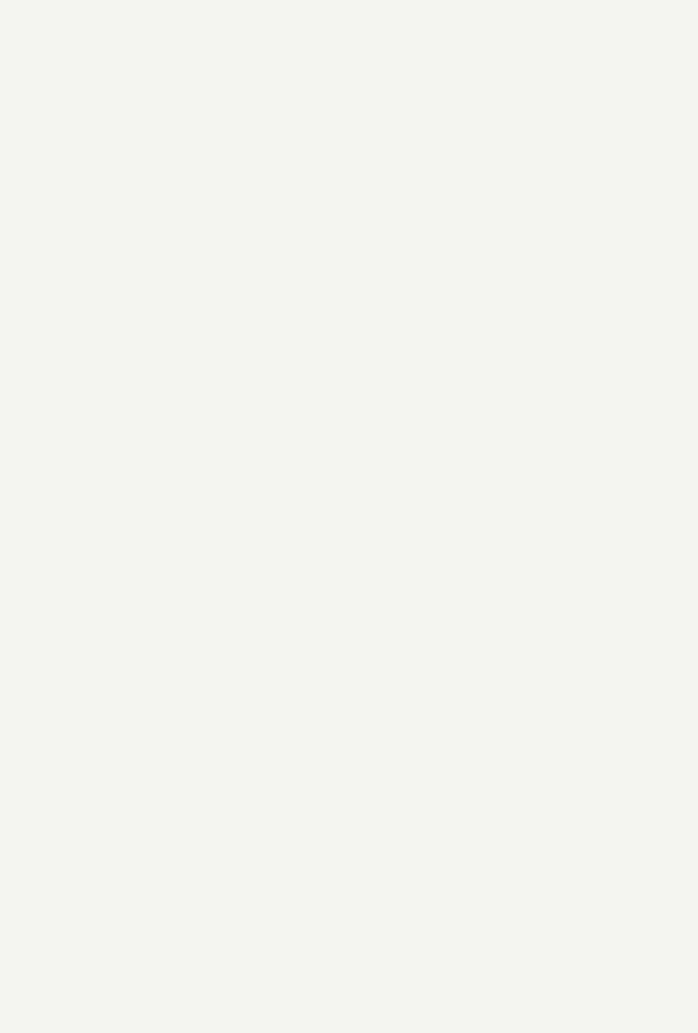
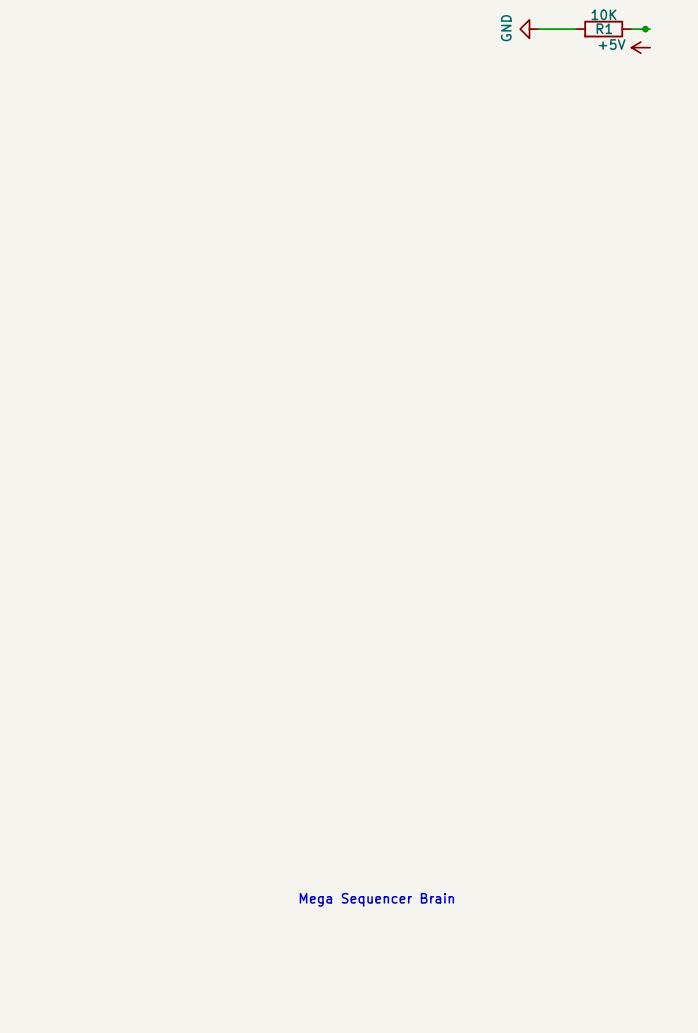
power symbol: none -> GND (529, 29)
wire: none -> (538, 29) (575, 29)
R1: none -> 10K (603, 29)
wire: none -> (631, 29) (650, 29)
junction: none -> (645, 29)
power symbol: none -> +5V (640, 47)
text: none -> Mega Sequencer Brain (376, 899)

